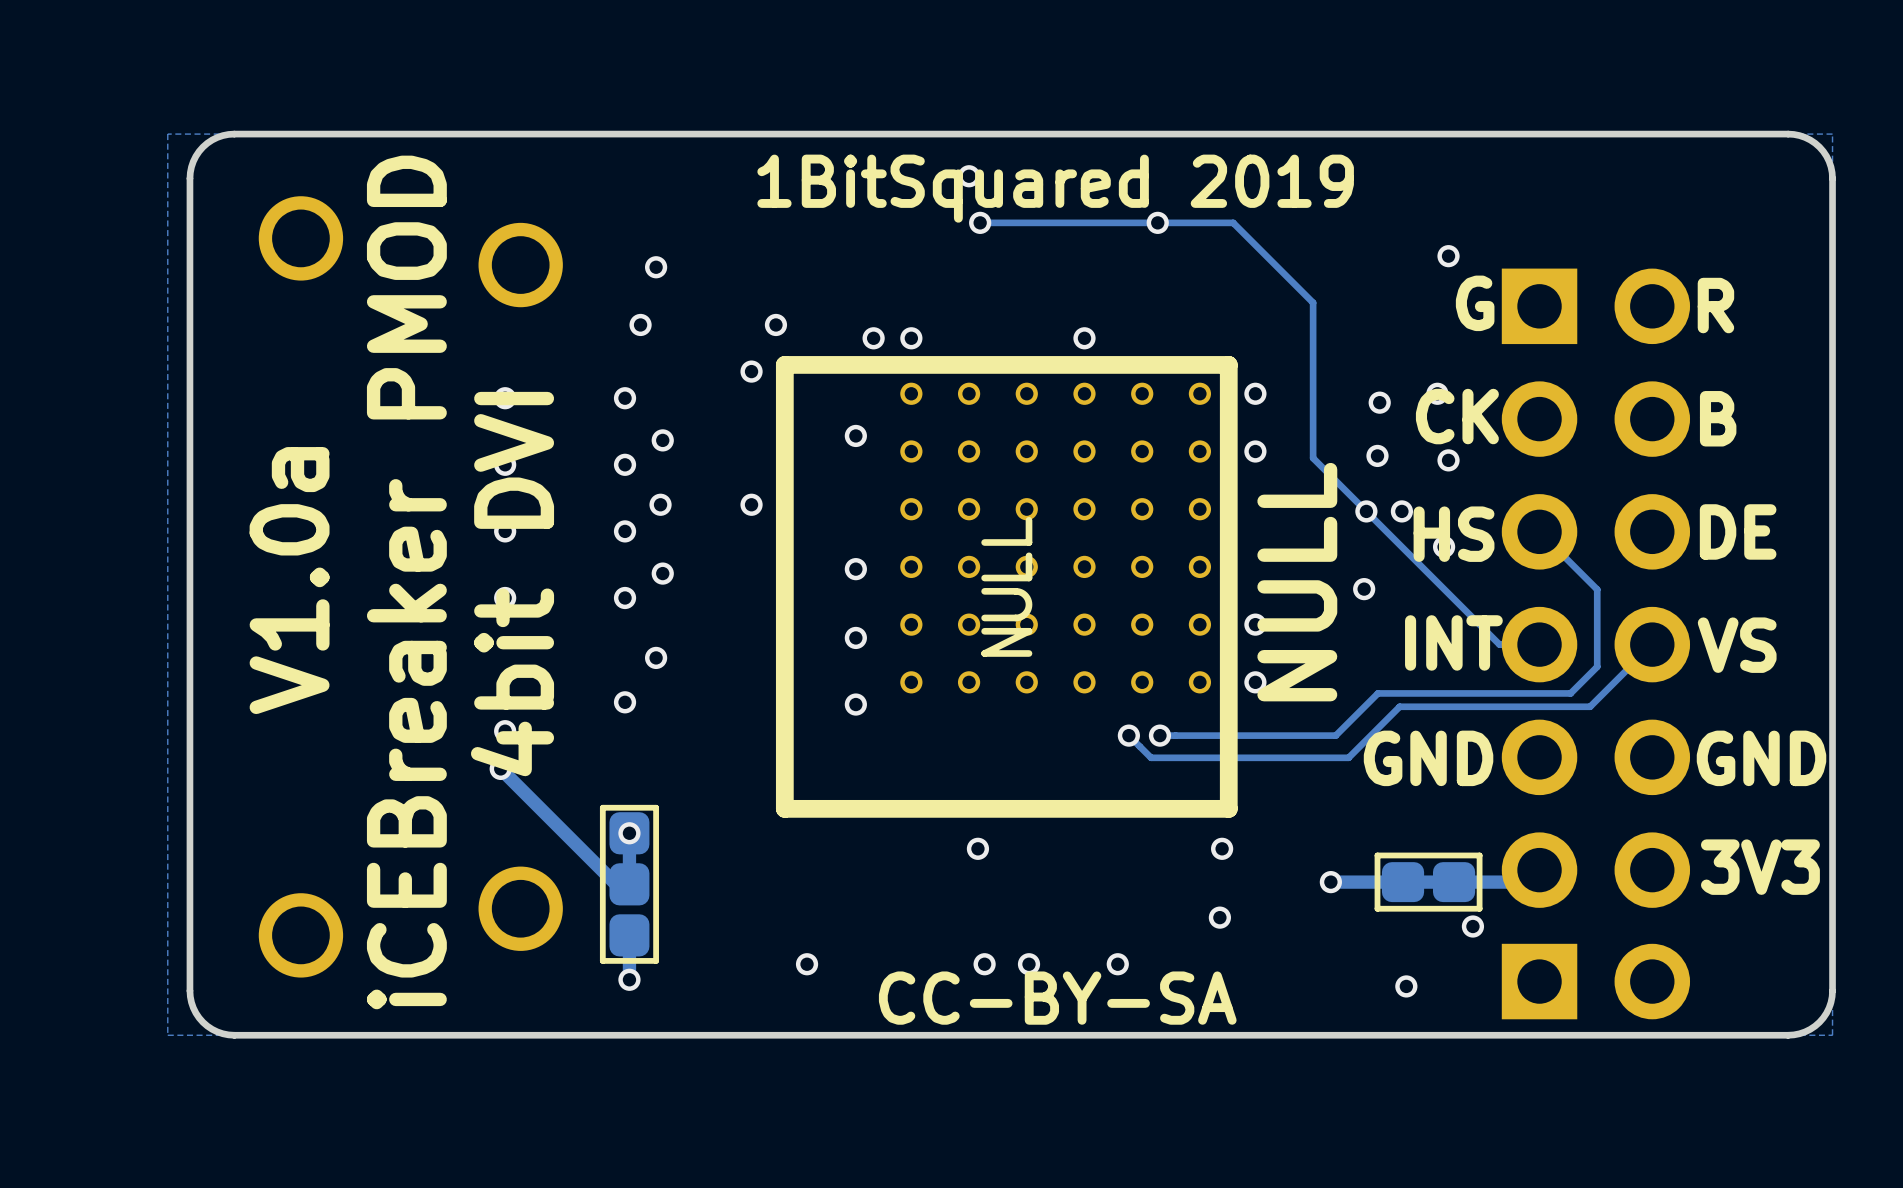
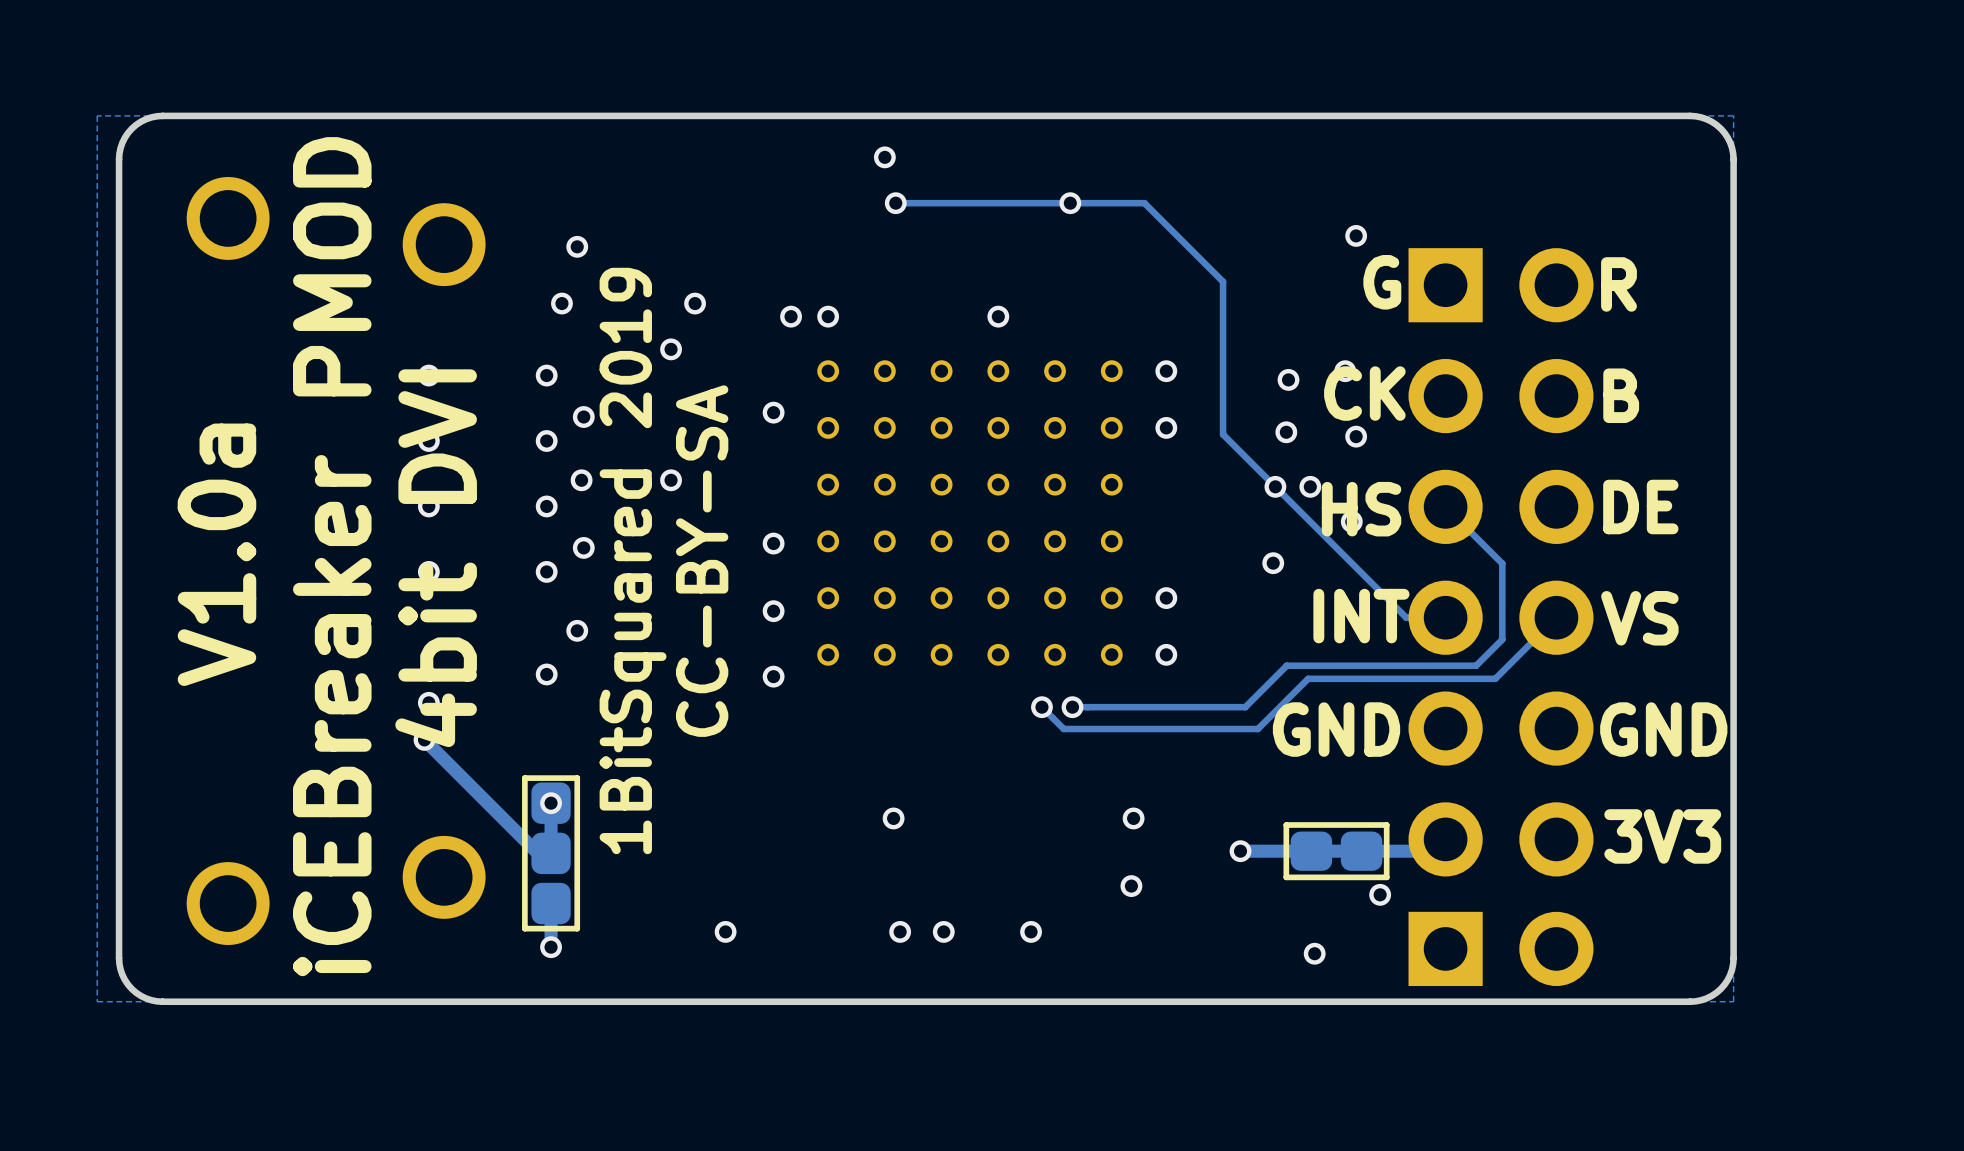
text rotation: 0° (1055, 188) -> 90° counterclockwise (633, 561)
drawing: [775, 356, 1238, 818] -> none
text: NULL (1297, 582) -> none
text rotation: 0° (1057, 998) -> 90° counterclockwise (702, 561)
text position: CC-BY-SA (1057, 998) -> CC-BY-SA (702, 561)

